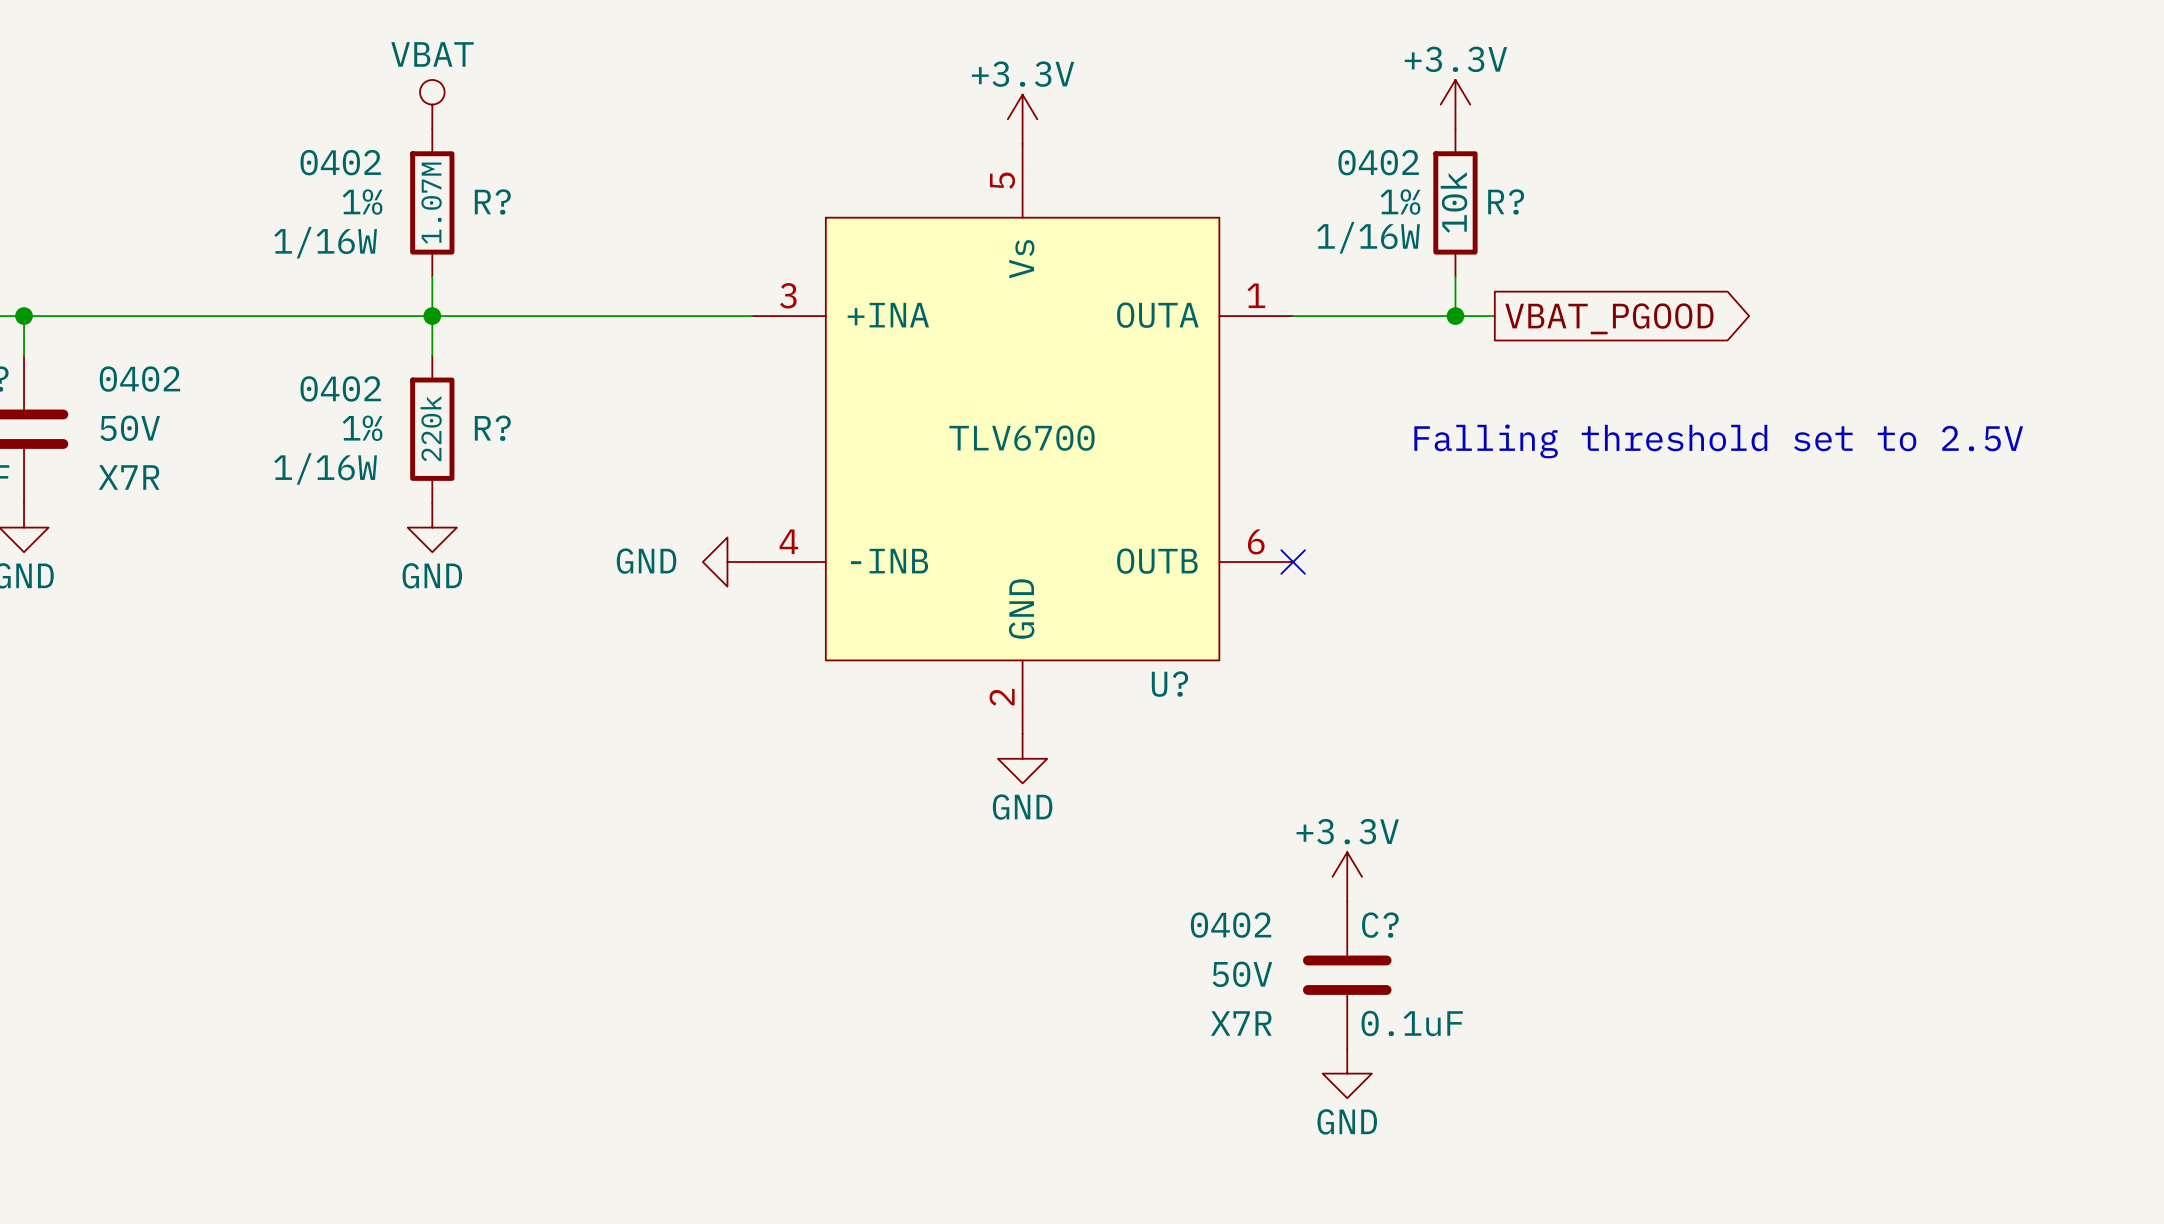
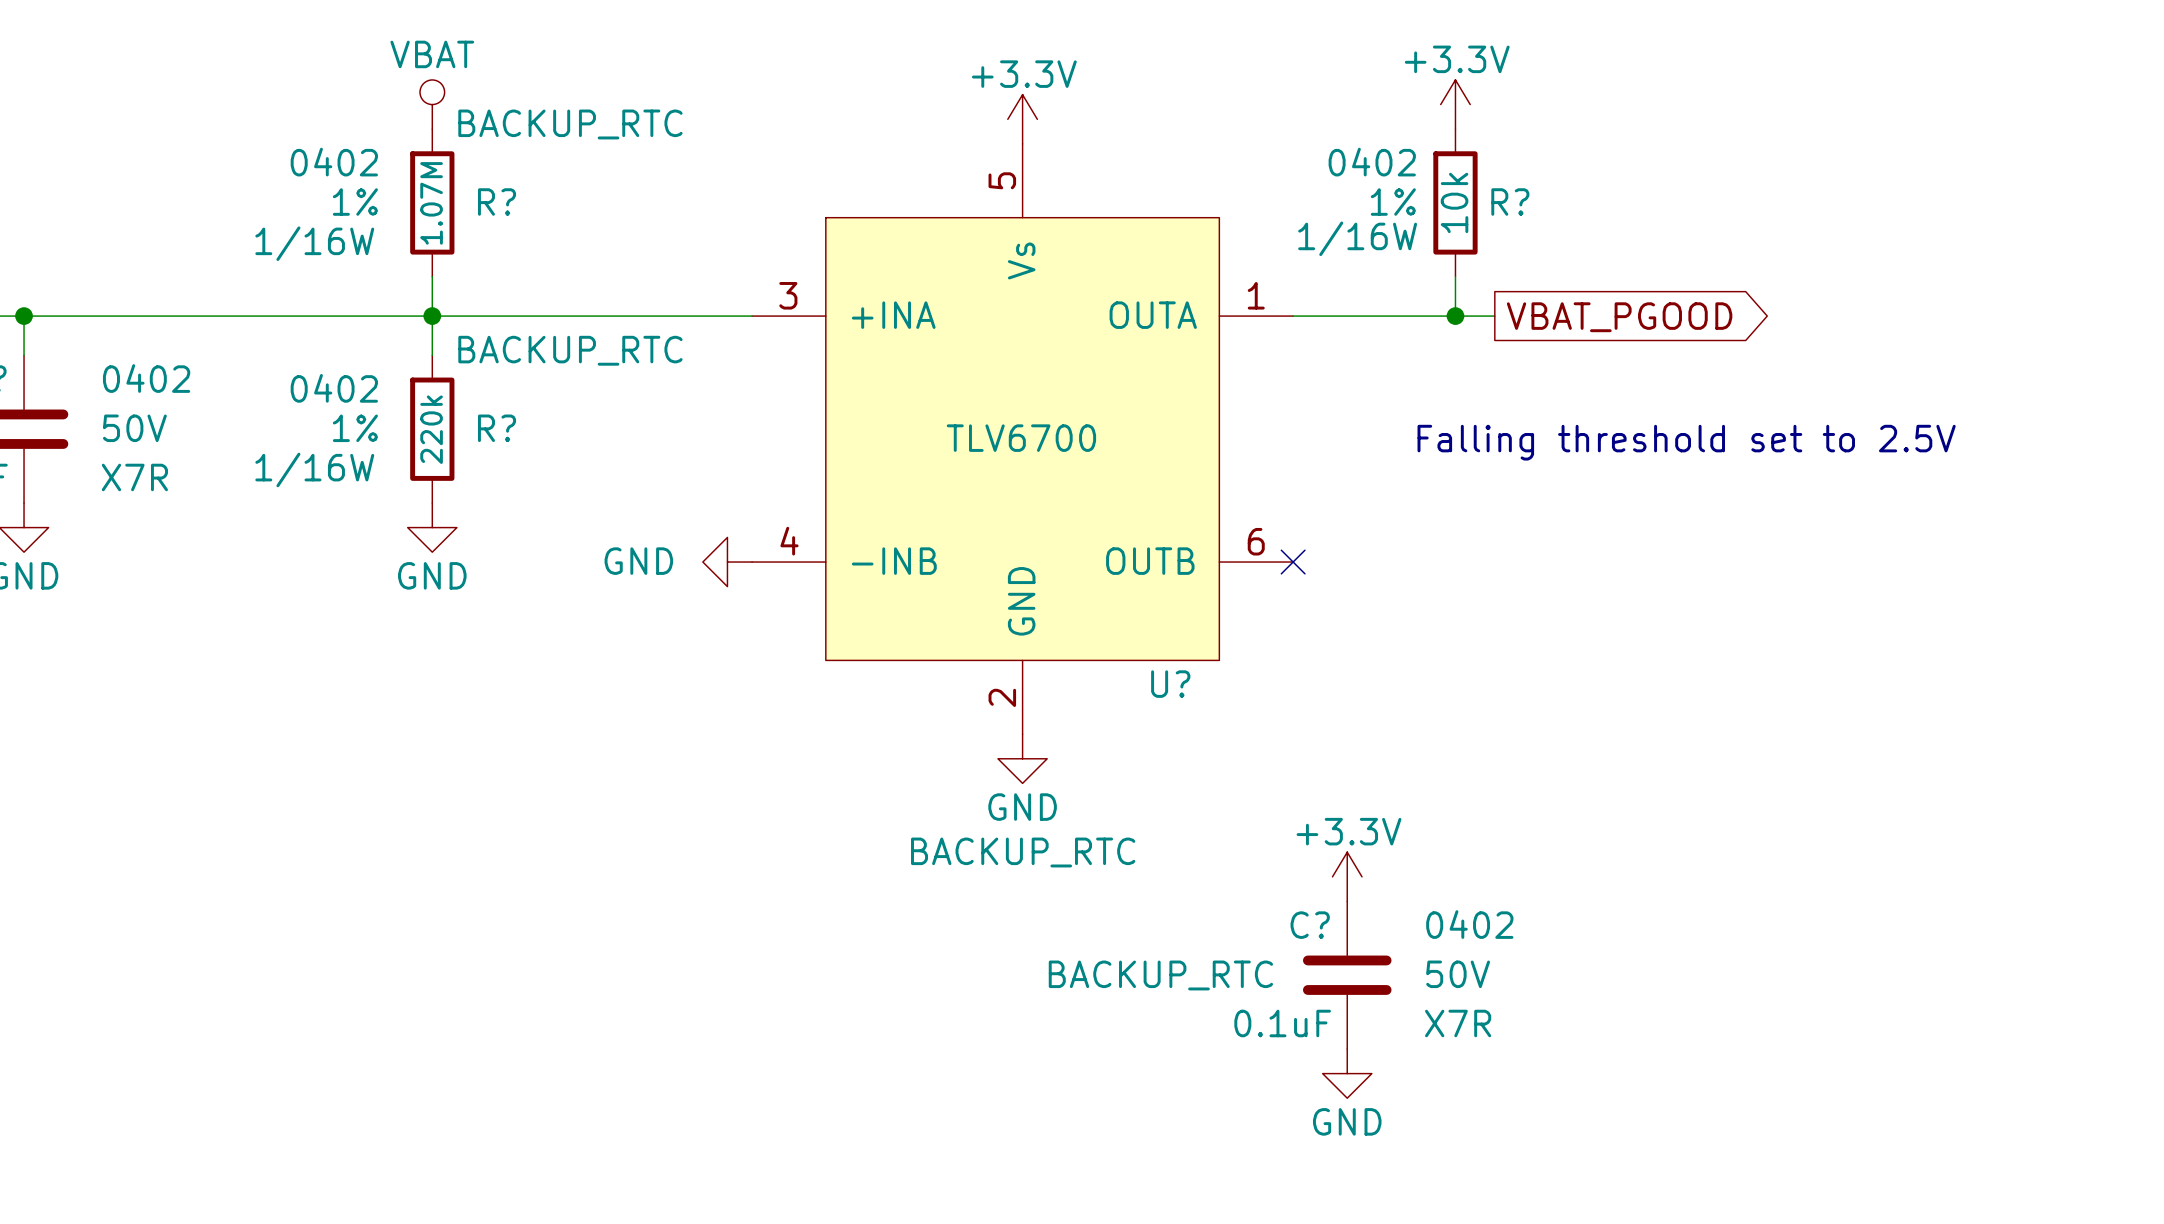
R? text: none -> BACKUP_RTC (570, 124)
R? text: none -> BACKUP_RTC (570, 350)
U? text: none -> BACKUP_RTC (1023, 852)
C? text position: 0402 (1231, 925) -> 0402 (1469, 924)
C? name position: C? (1380, 925) -> C? (1310, 925)
C? text position: 50V (1242, 974) -> 50V (1458, 974)
C? text: none -> BACKUP_RTC (1160, 975)
C? text position: X7R (1241, 1023) -> X7R (1458, 1023)
C? value position: 0.1uF (1412, 1023) -> 0.1uF (1282, 1023)

